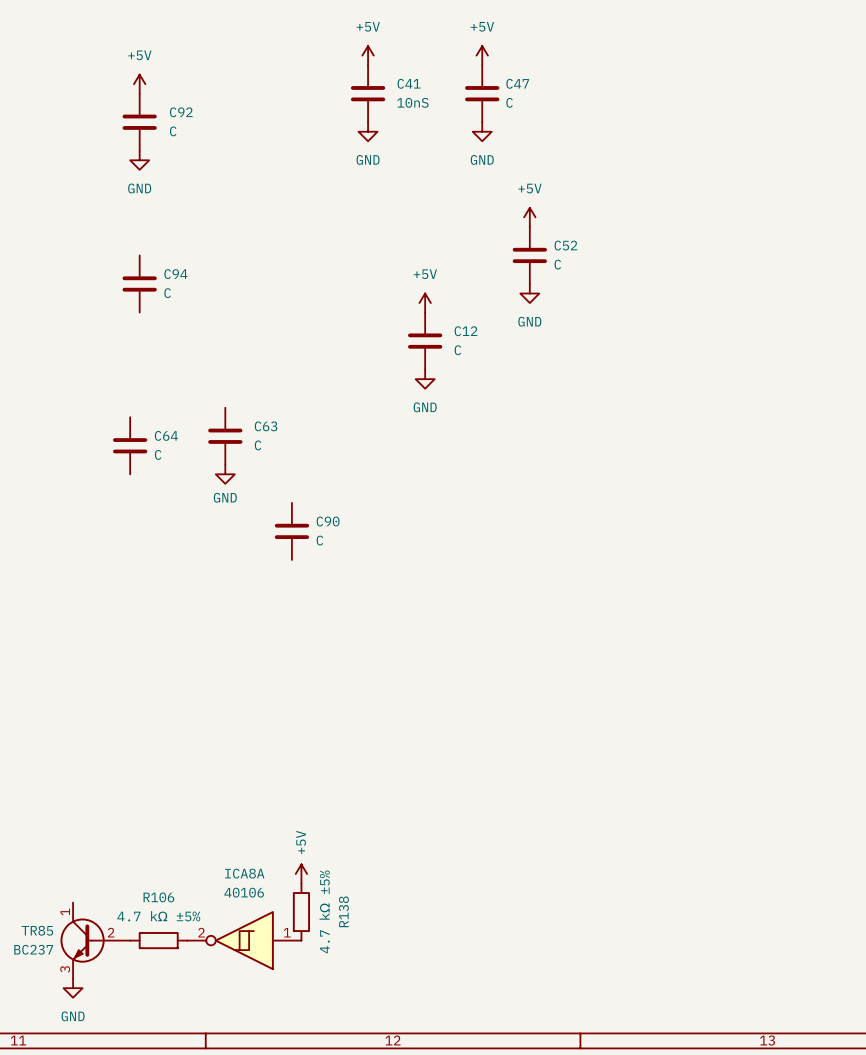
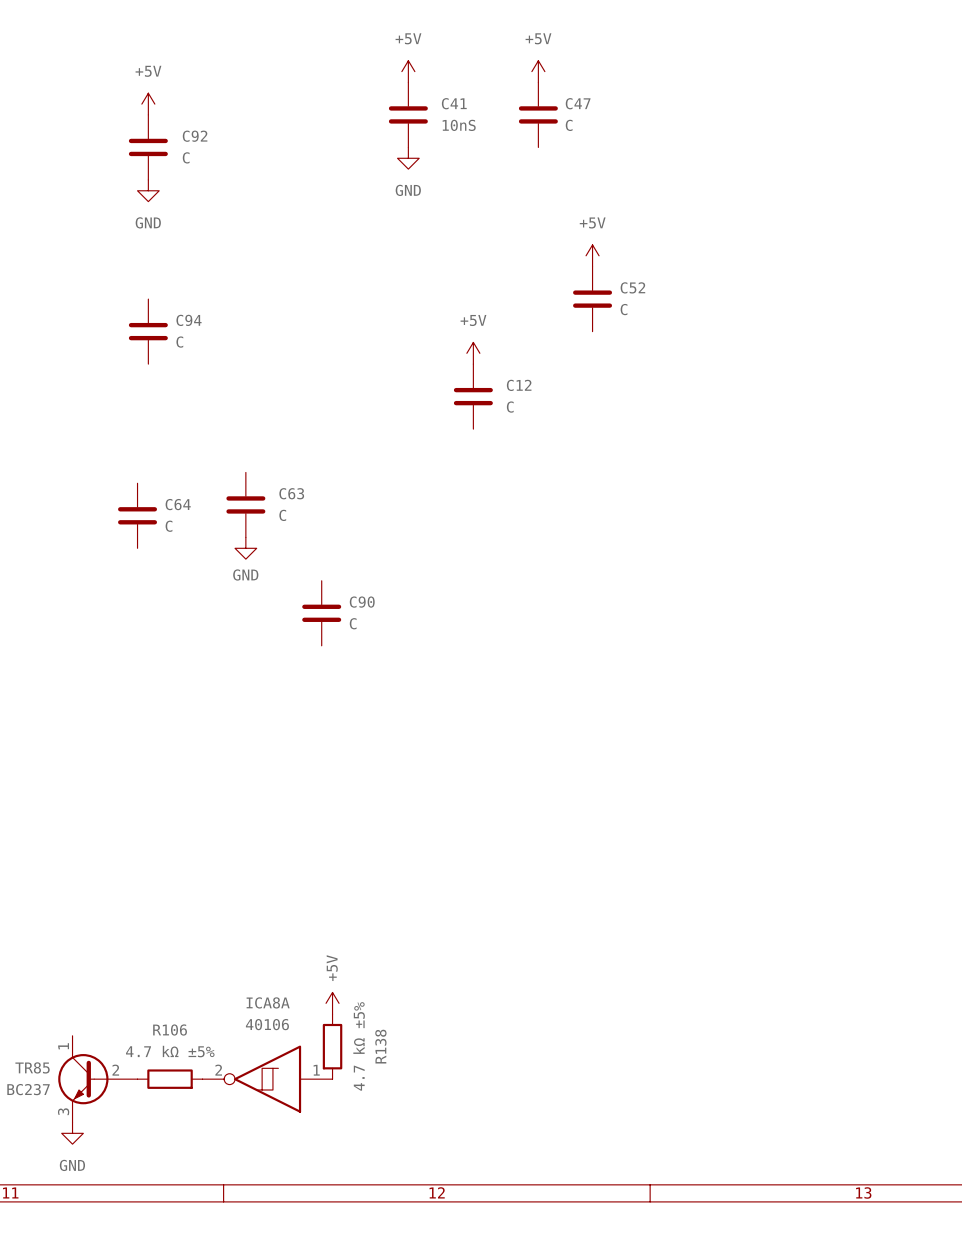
power symbol: GND (482, 131) -> none
power symbol: GND (529, 293) -> none
power symbol: GND (425, 379) -> none

